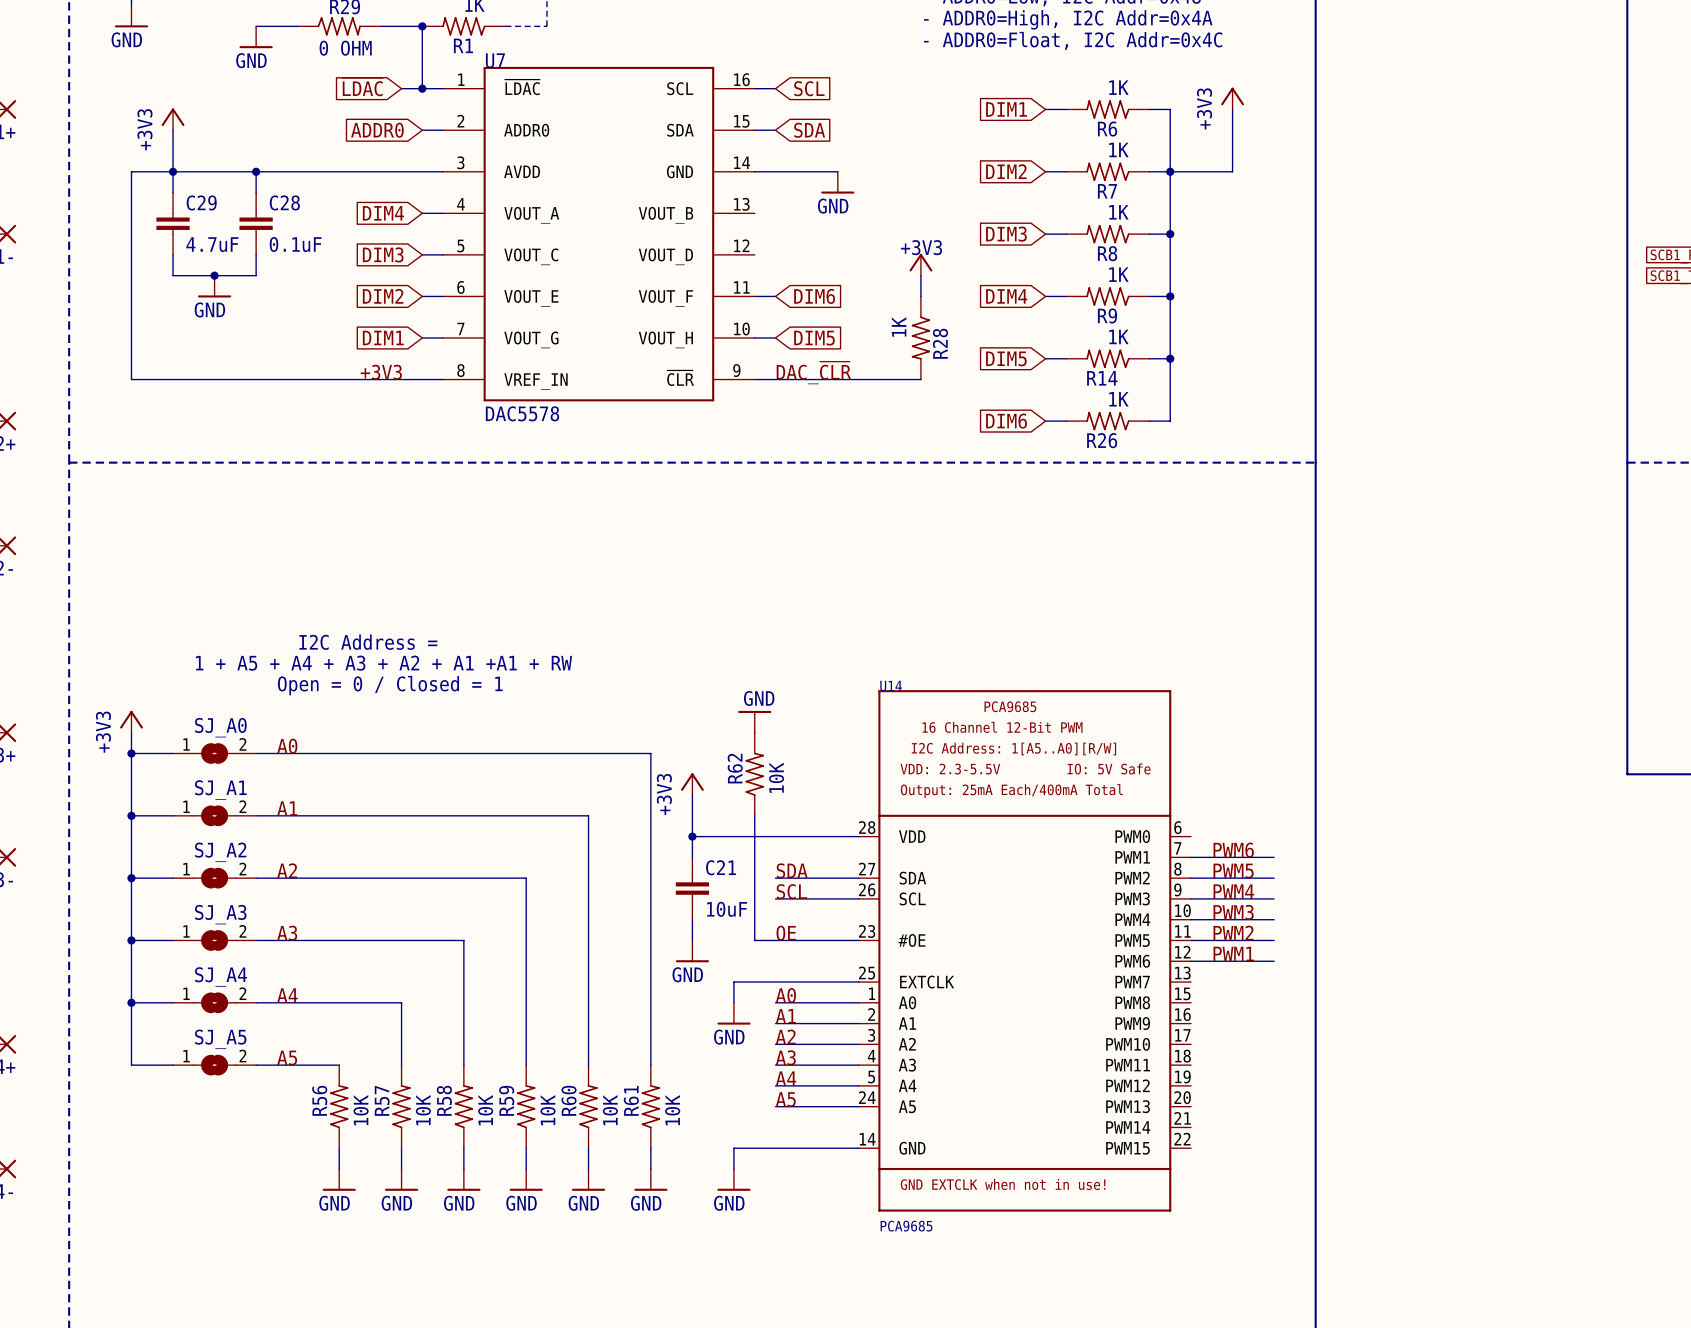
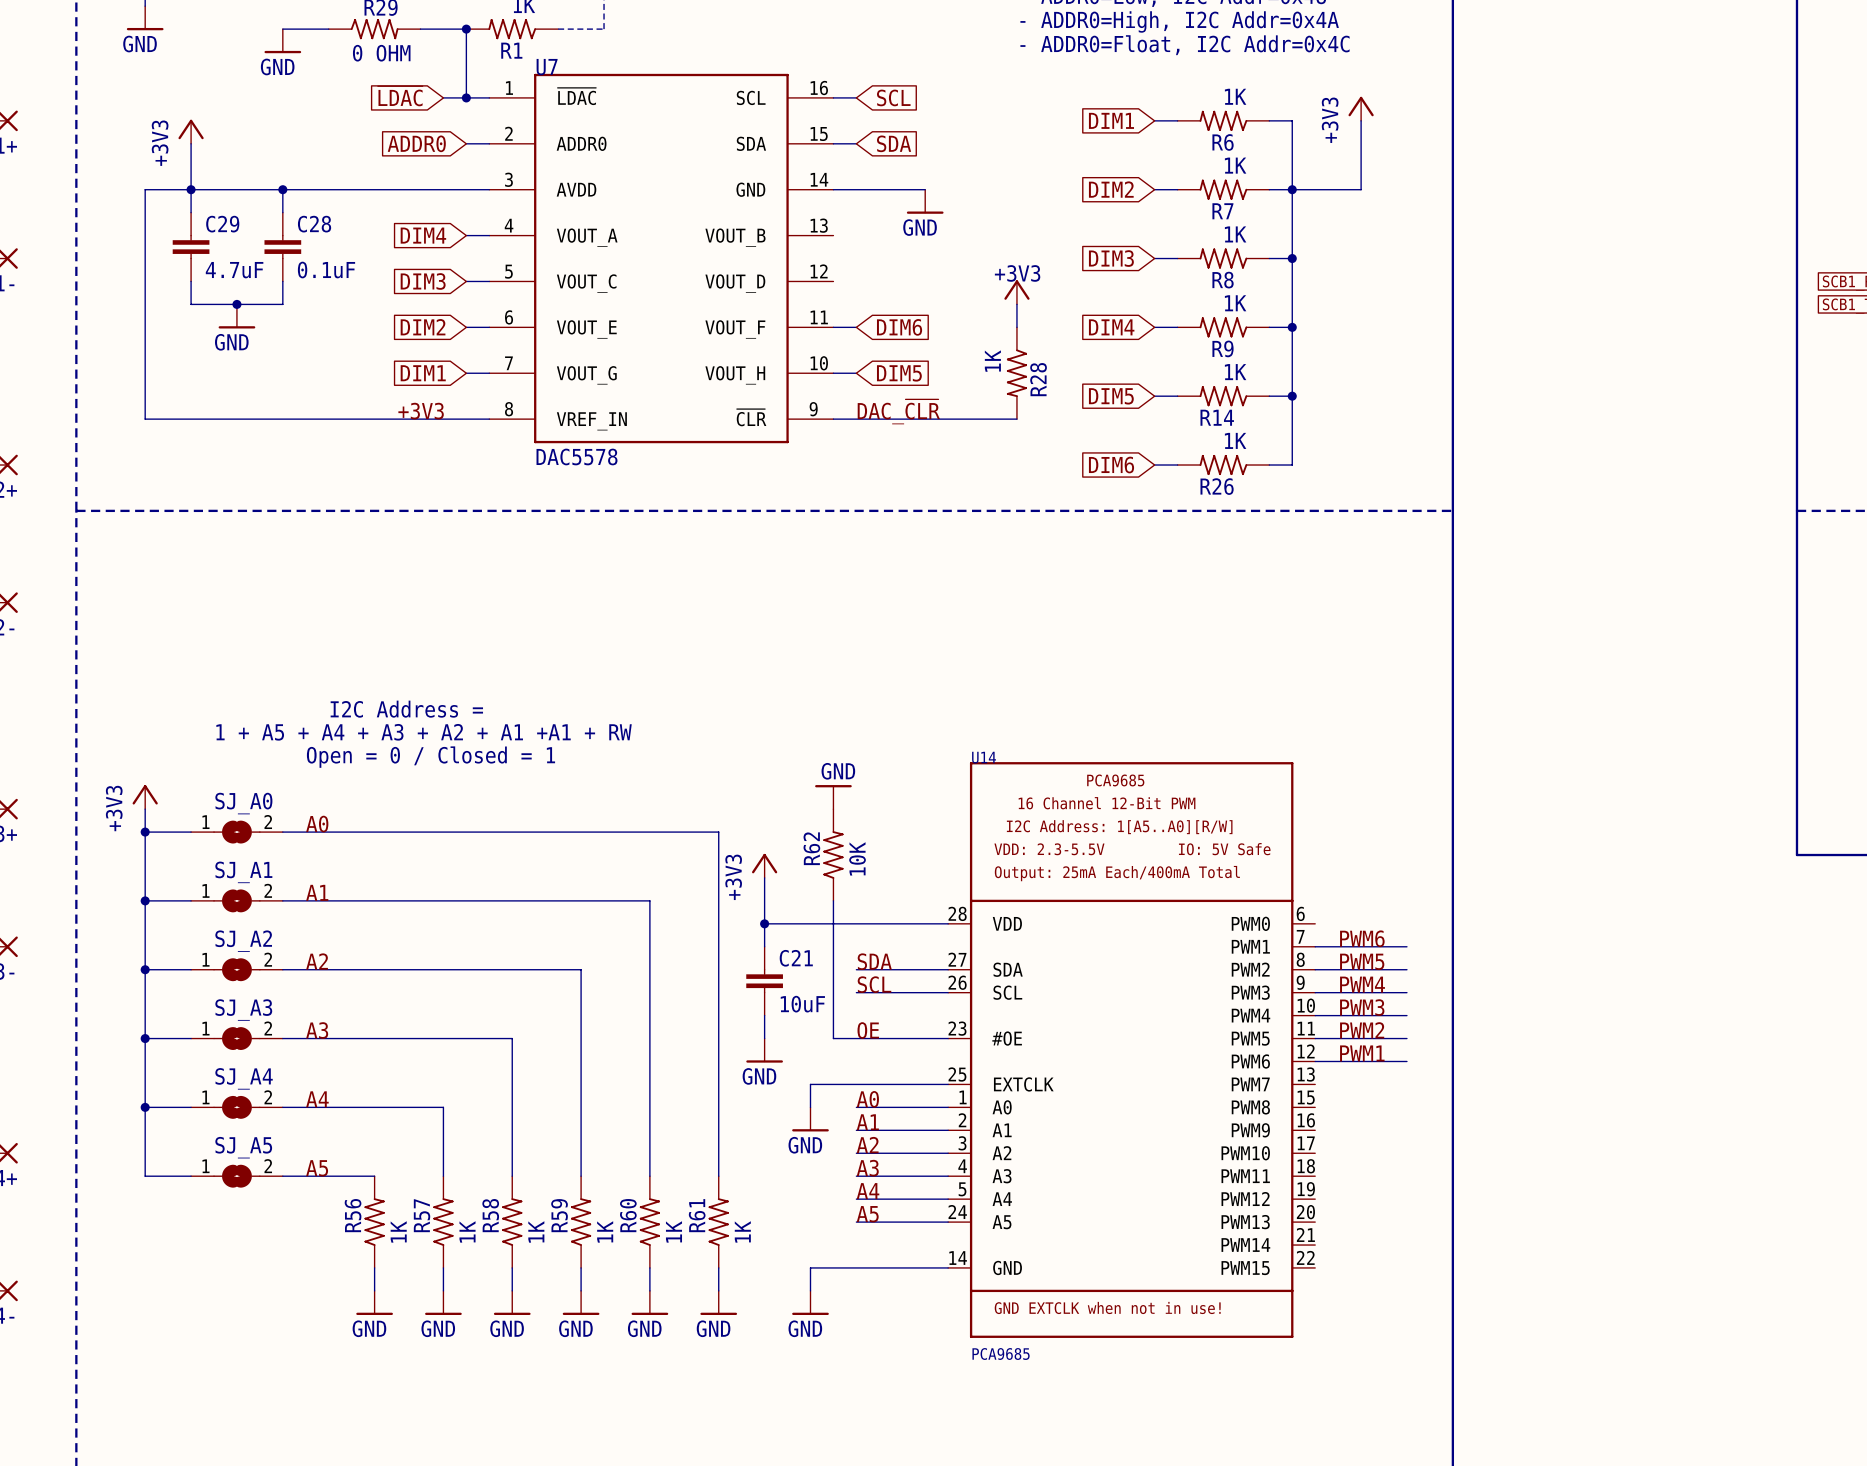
R56 value: 10K (361, 1110) -> 1K (398, 1231)
R57 value: 10K (423, 1110) -> 1K (467, 1231)
R58 value: 10K (485, 1110) -> 1K (536, 1231)
R59 value: 10K (548, 1110) -> 1K (605, 1231)
R60 value: 10K (610, 1110) -> 1K (673, 1231)
R61 value: 10K (672, 1110) -> 1K (742, 1231)

